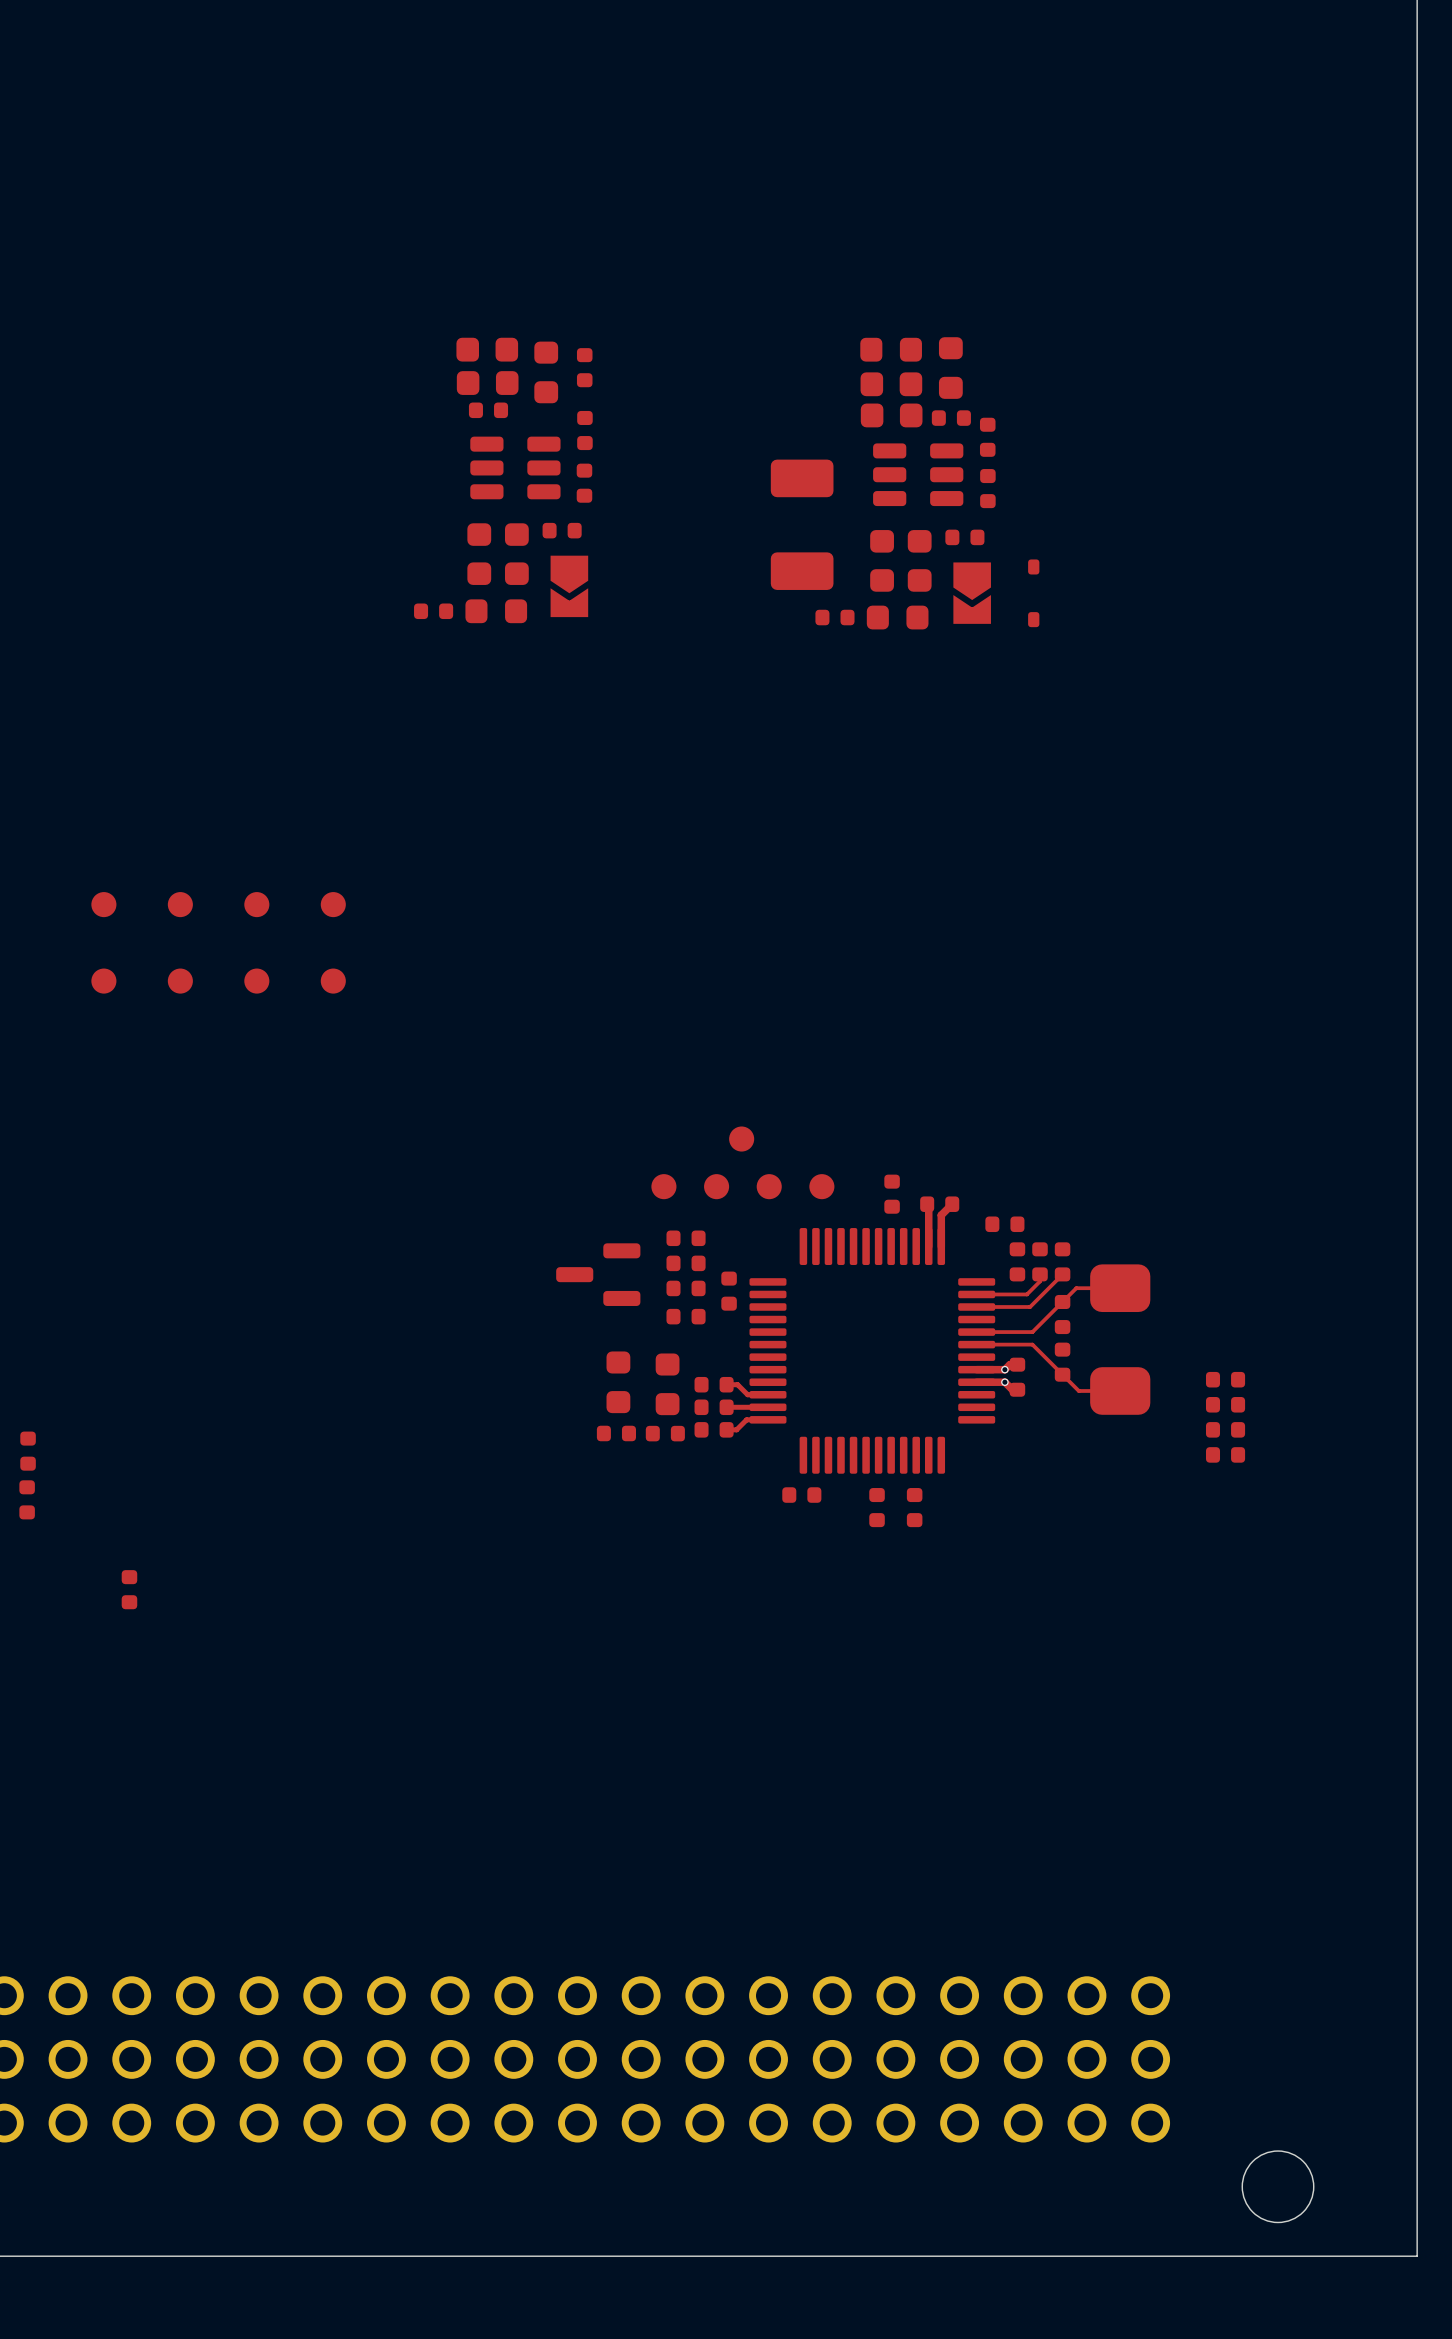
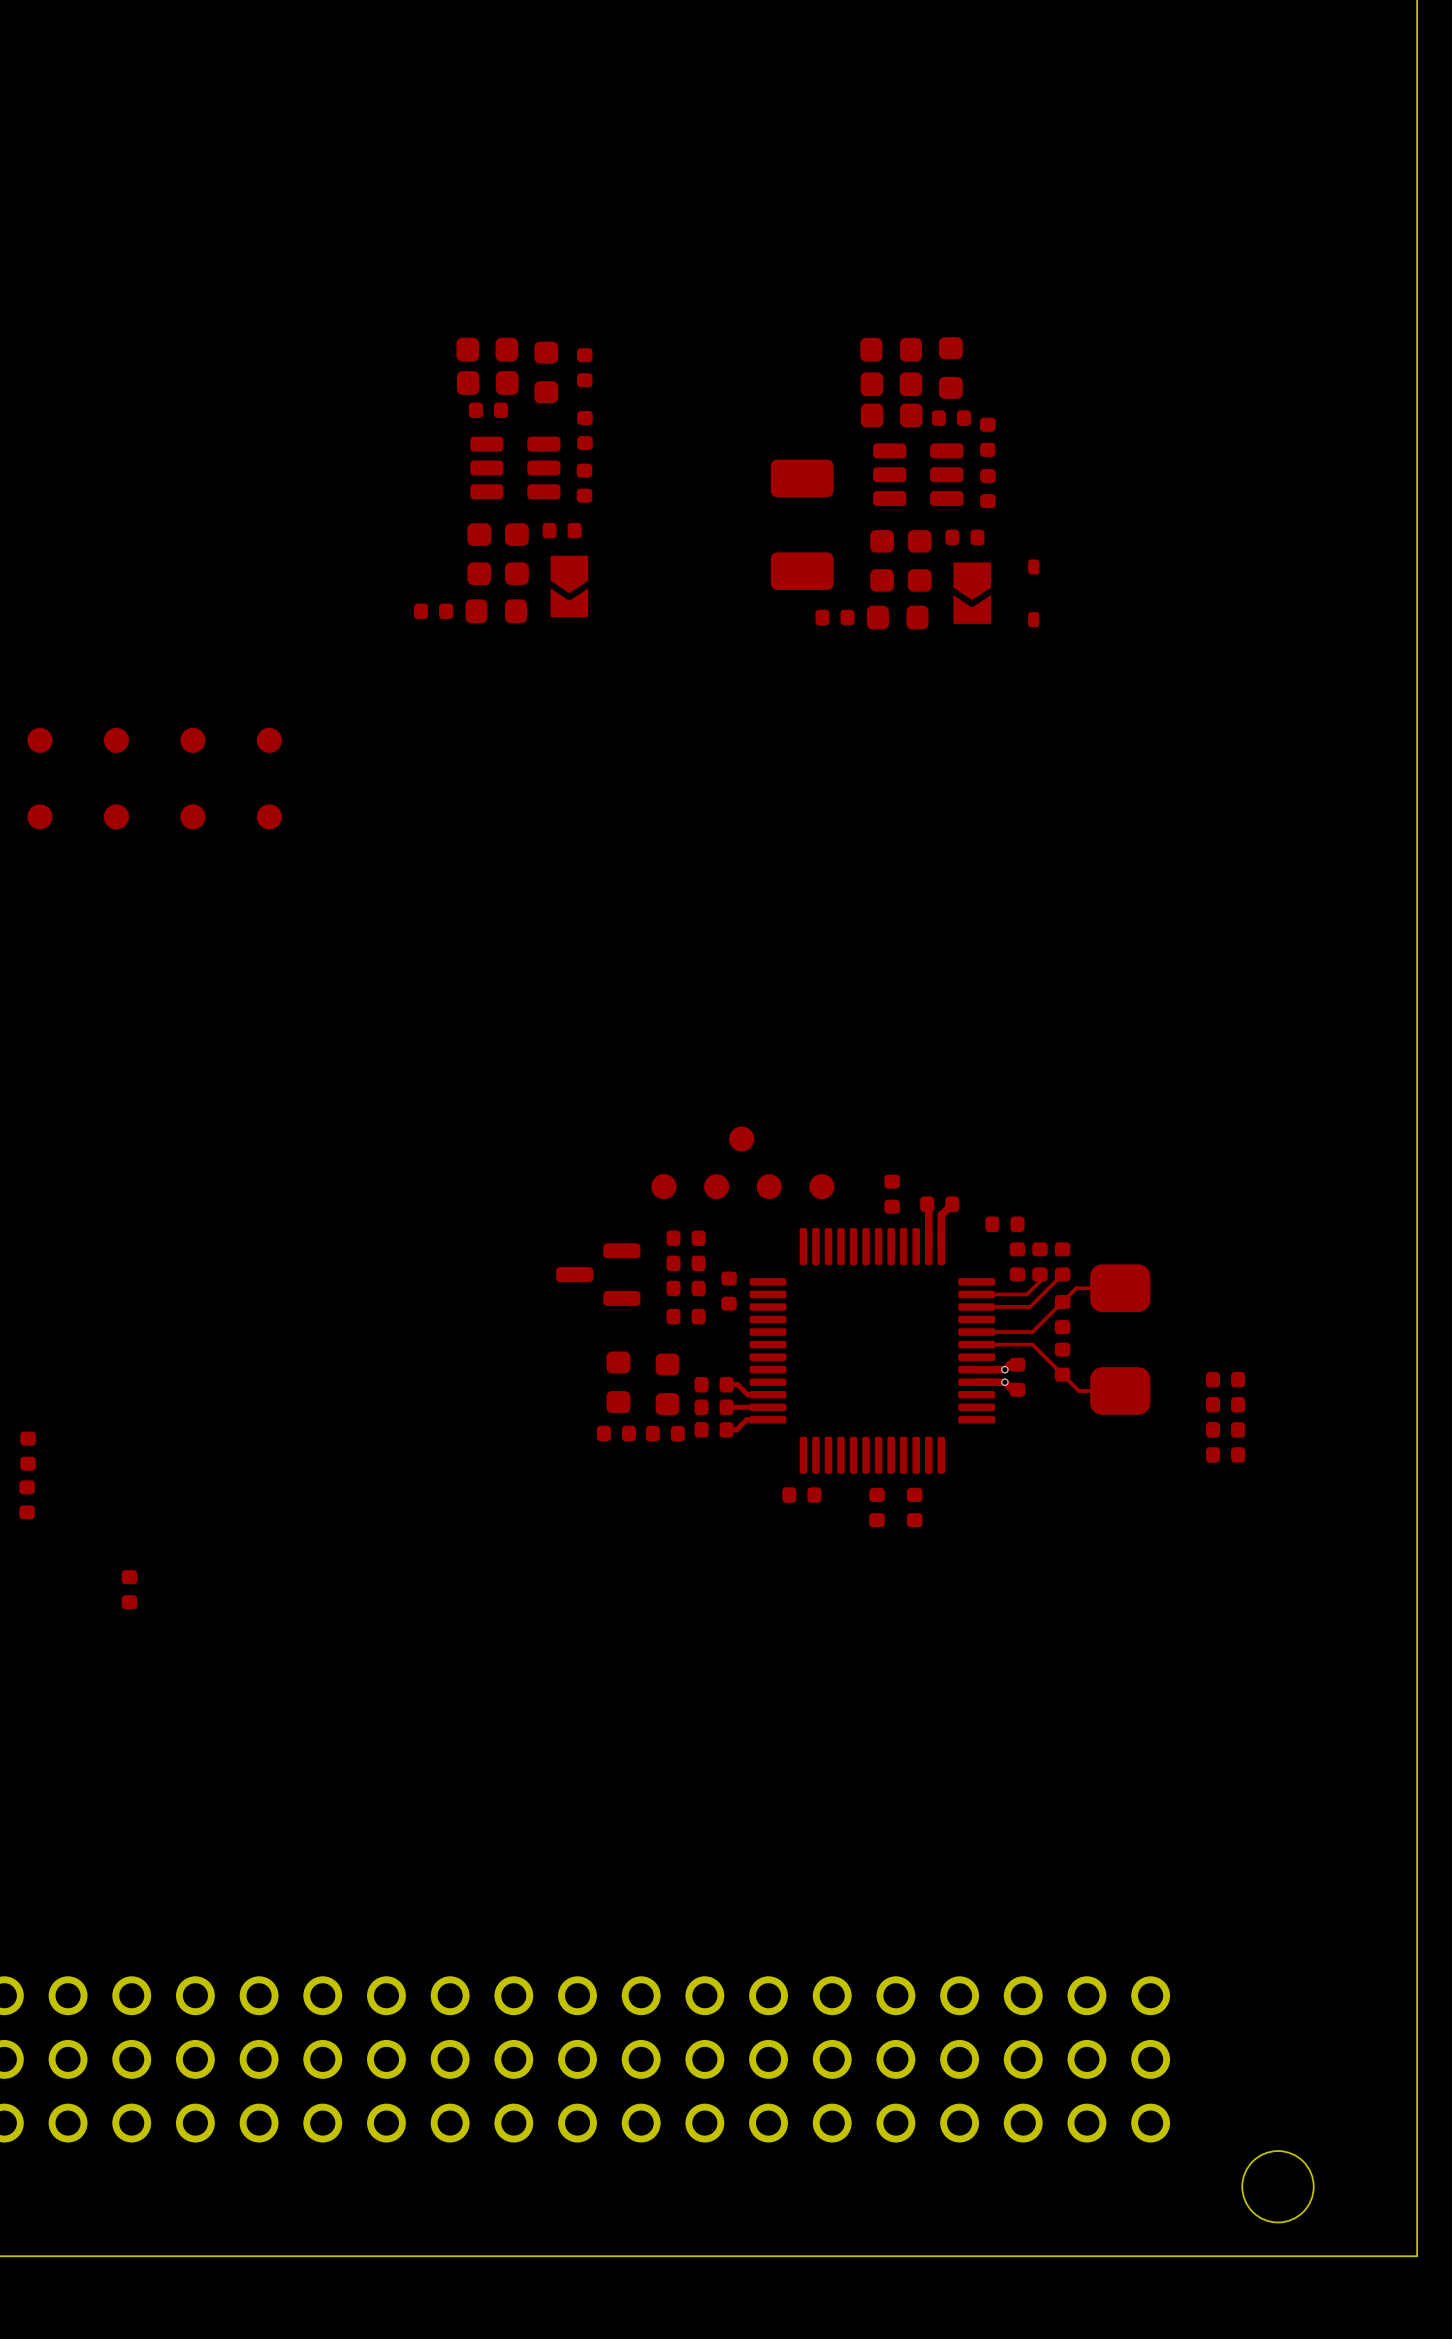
part: none -> (39, 740)
part: none -> (116, 740)
part: none -> (192, 740)
part: none -> (269, 740)
part: none -> (39, 816)
part: none -> (116, 816)
part: none -> (192, 816)
part: none -> (269, 816)
part: (103, 904) -> none
part: (180, 904) -> none
part: (256, 904) -> none
part: (333, 904) -> none
part: (103, 981) -> none
part: (180, 981) -> none
part: (256, 981) -> none
part: (333, 981) -> none

